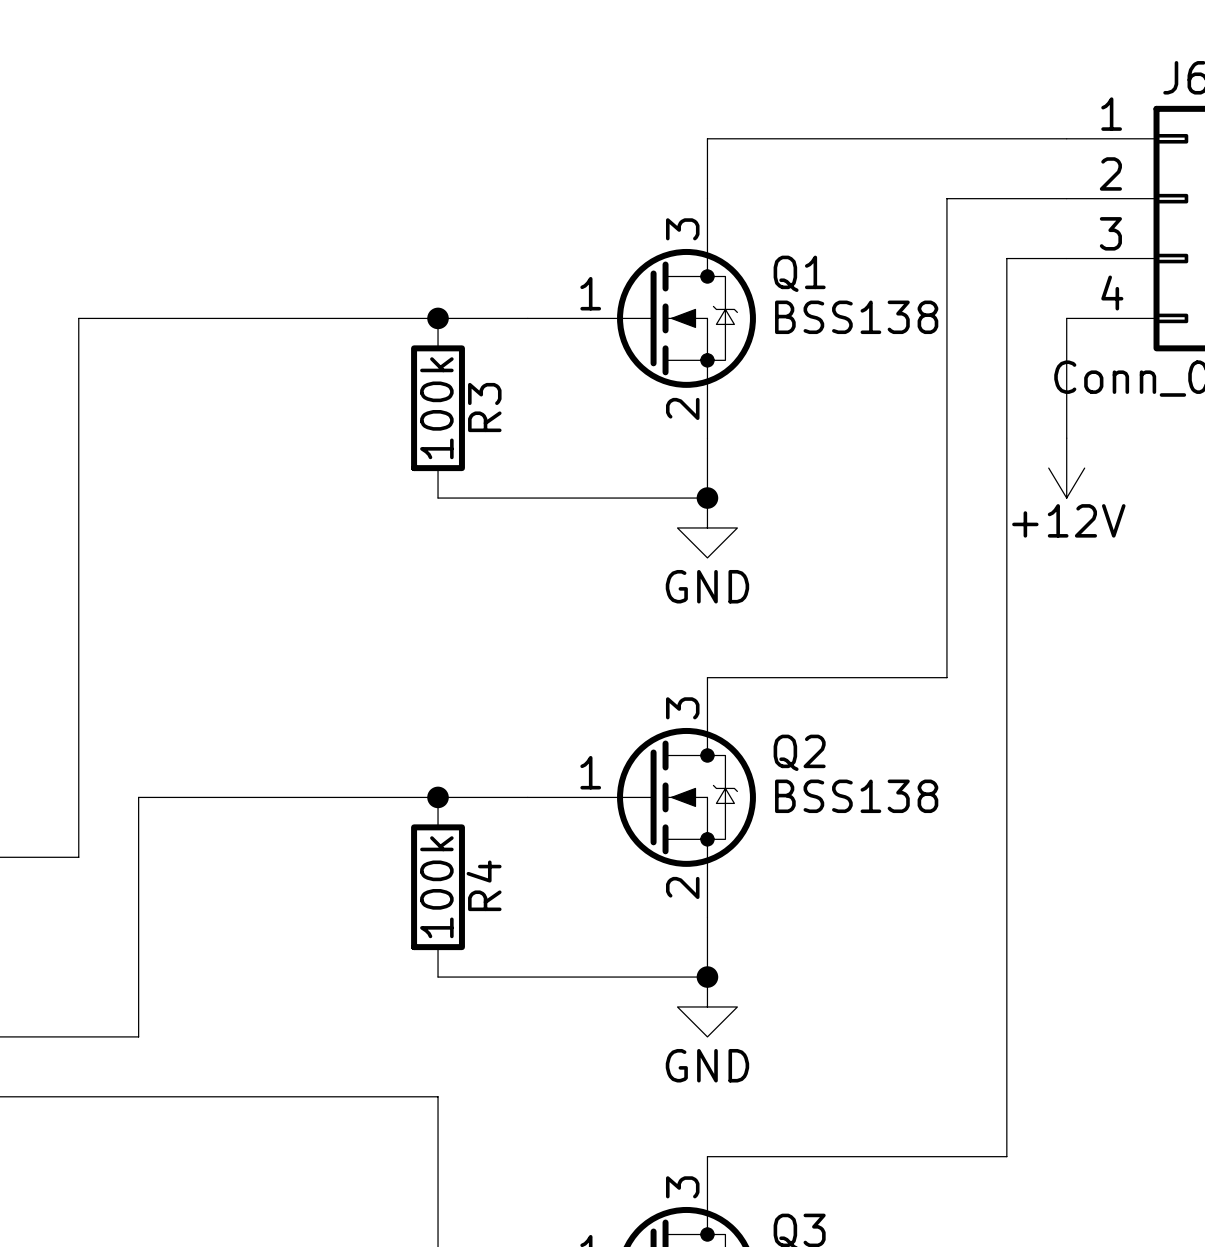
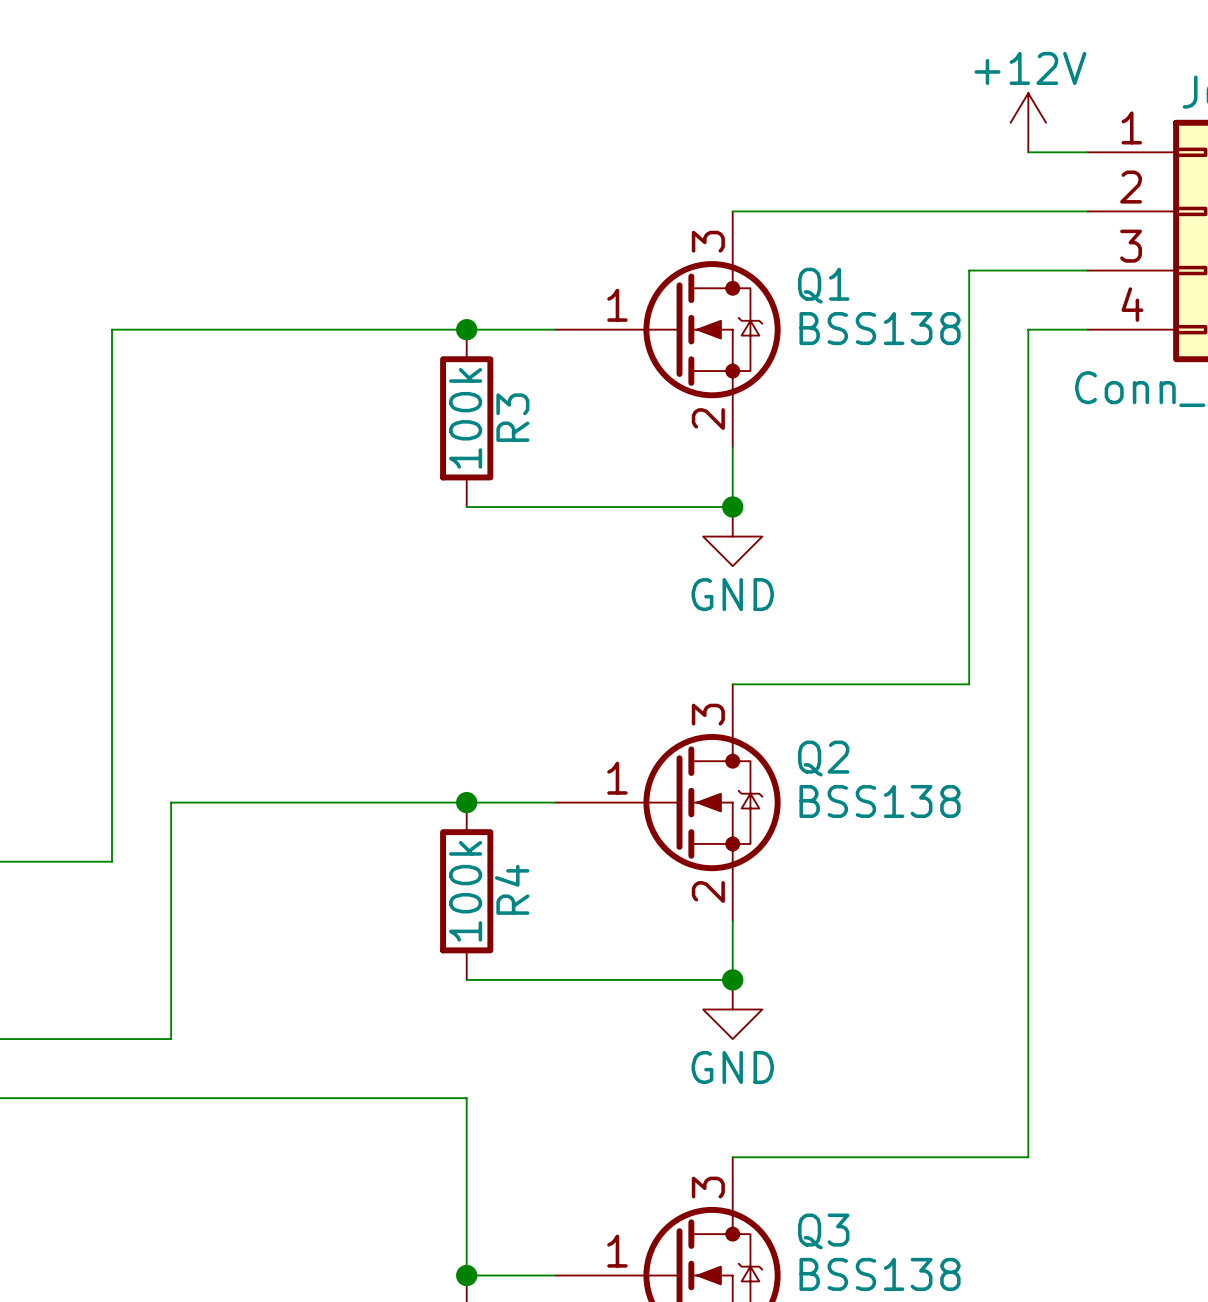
wire: (1006, 138) (707, 138) (707, 198) -> (969, 211) (732, 211)
wire: (946, 198) (946, 258) -> (1028, 270) (969, 270)
wire: (1006, 258) (1006, 318) -> (1087, 329) (1028, 329)
wire: (1066, 318) (1066, 438) -> none
power symbol rotation: 0° (1066, 468) -> 180° (1028, 122)
power symbol position: +12V (1066, 468) -> +12V (1028, 122)

